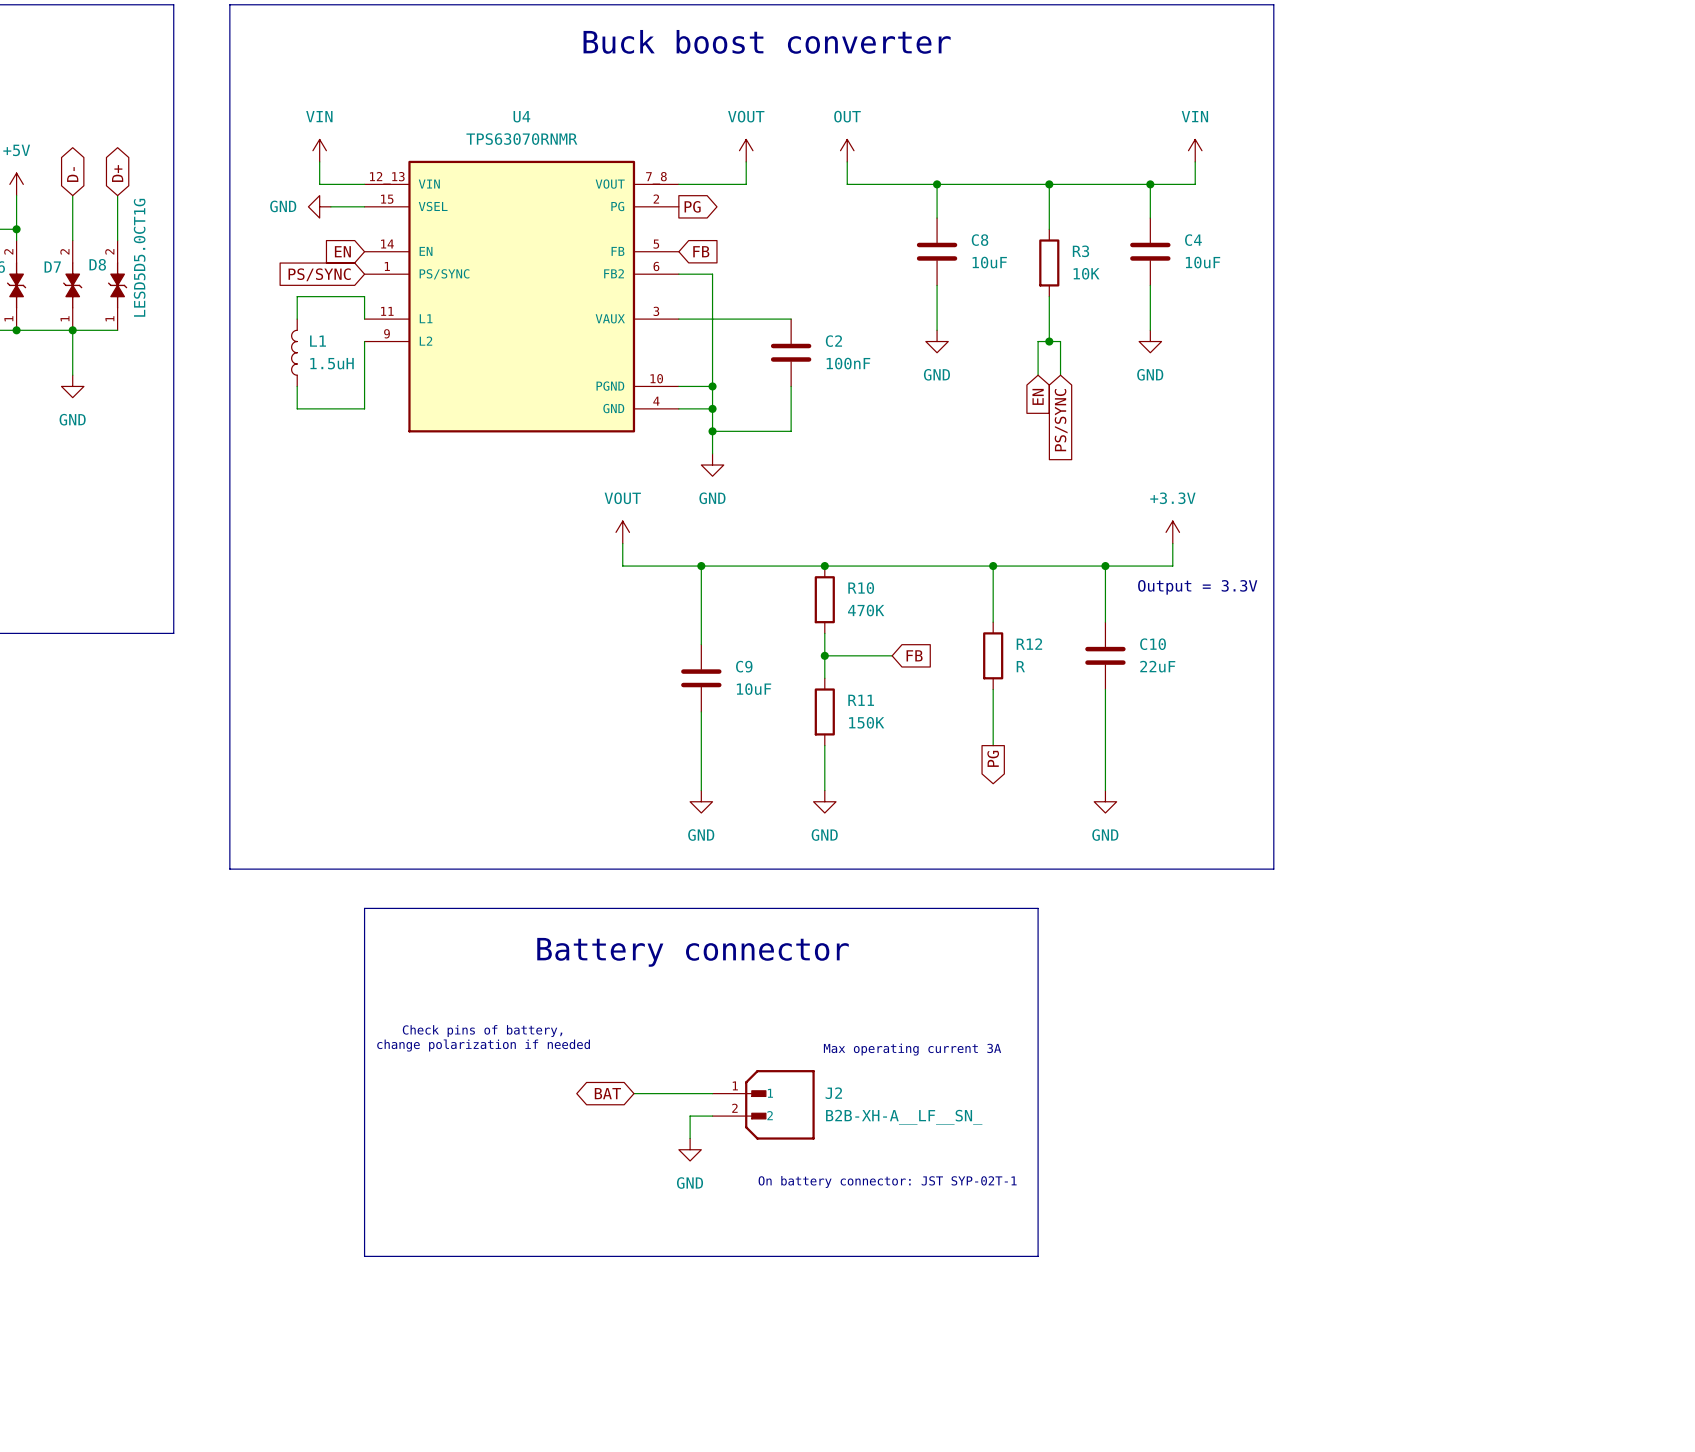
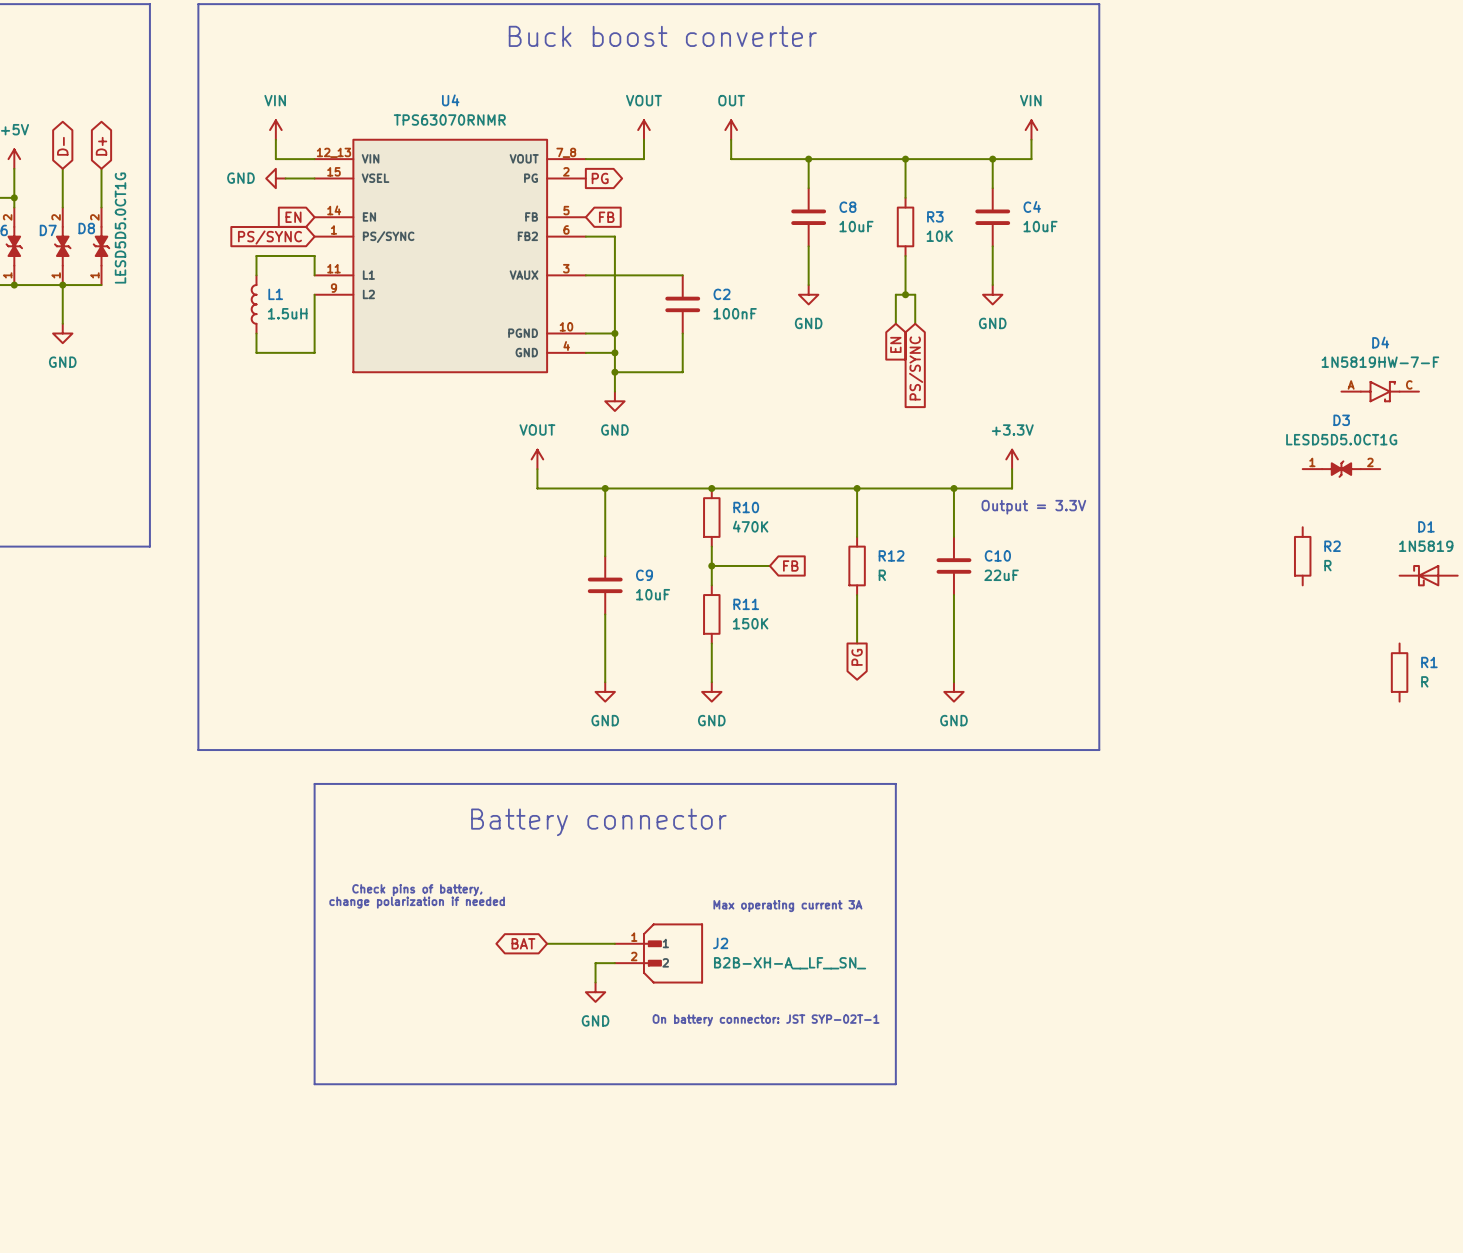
D4: none -> 1N5819HW-7-F (1380, 391)
D3: none -> LESD5D5.0CT1G (1341, 469)
R2: none -> R (1302, 556)
D1: none -> 1N5819 (1428, 575)
R1: none -> R (1399, 672)

